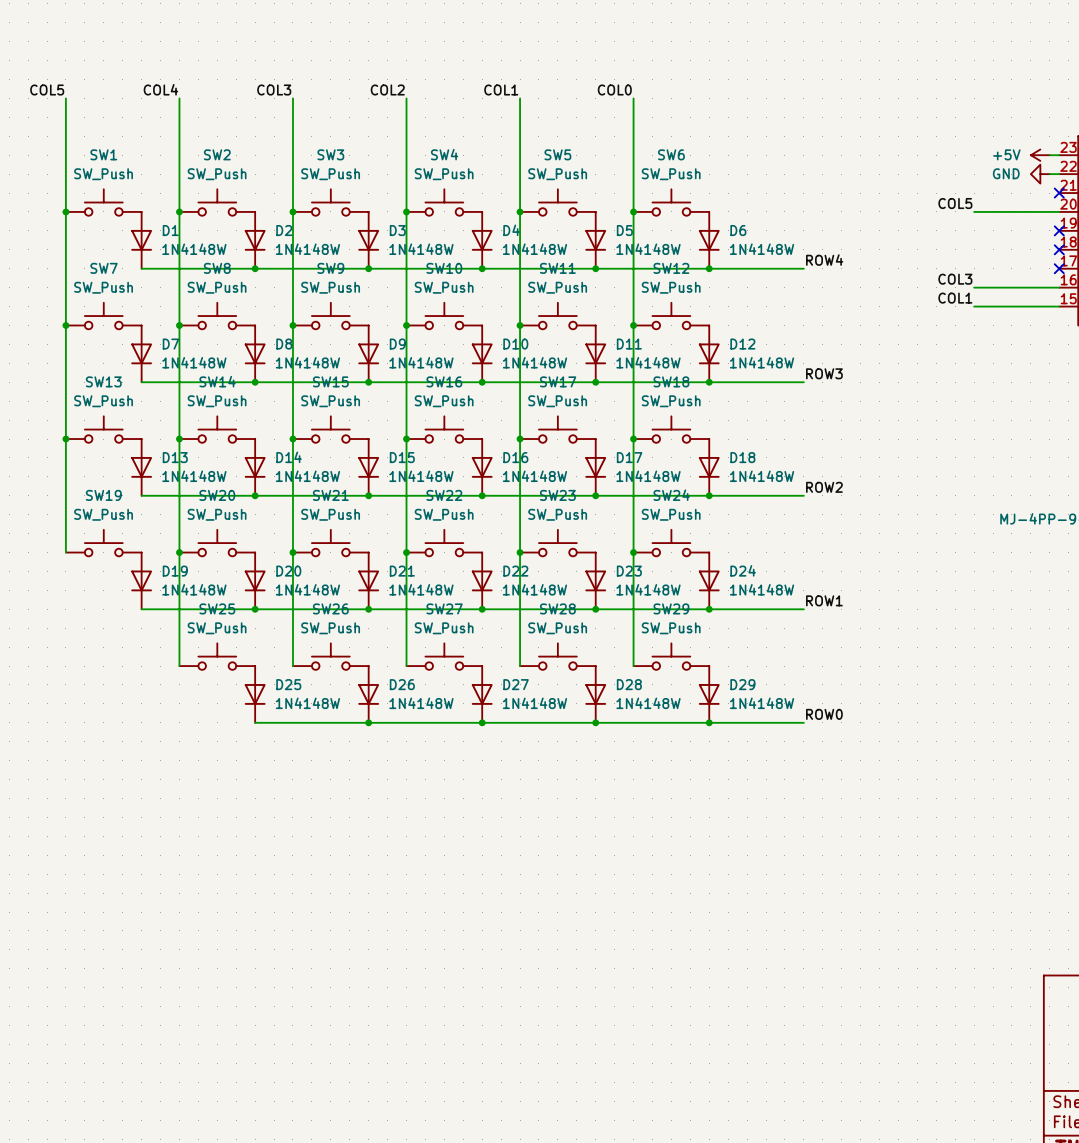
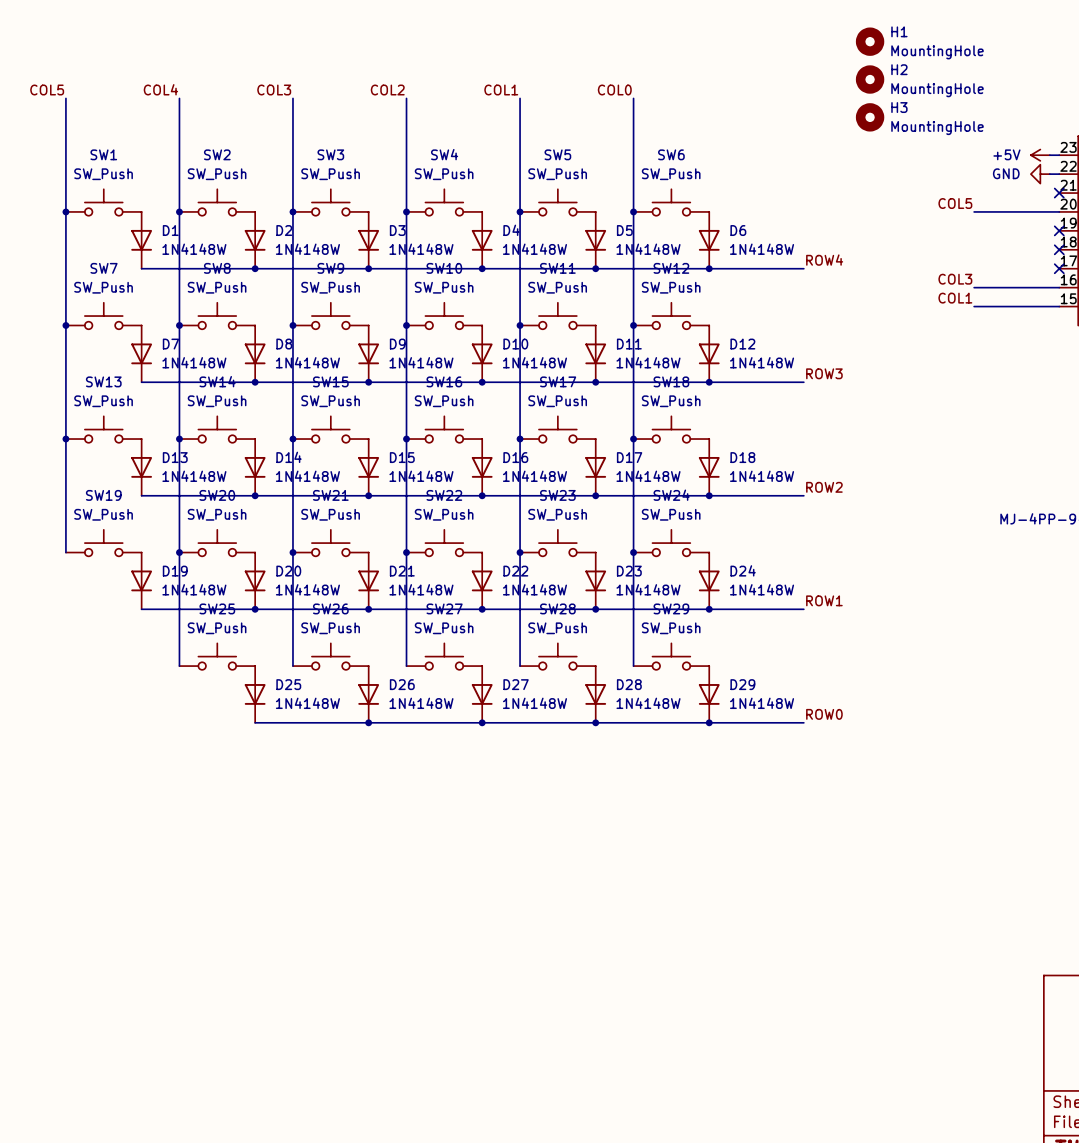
H1: none -> MountingHole (870, 41)
H2: none -> MountingHole (870, 79)
H3: none -> MountingHole (870, 117)

